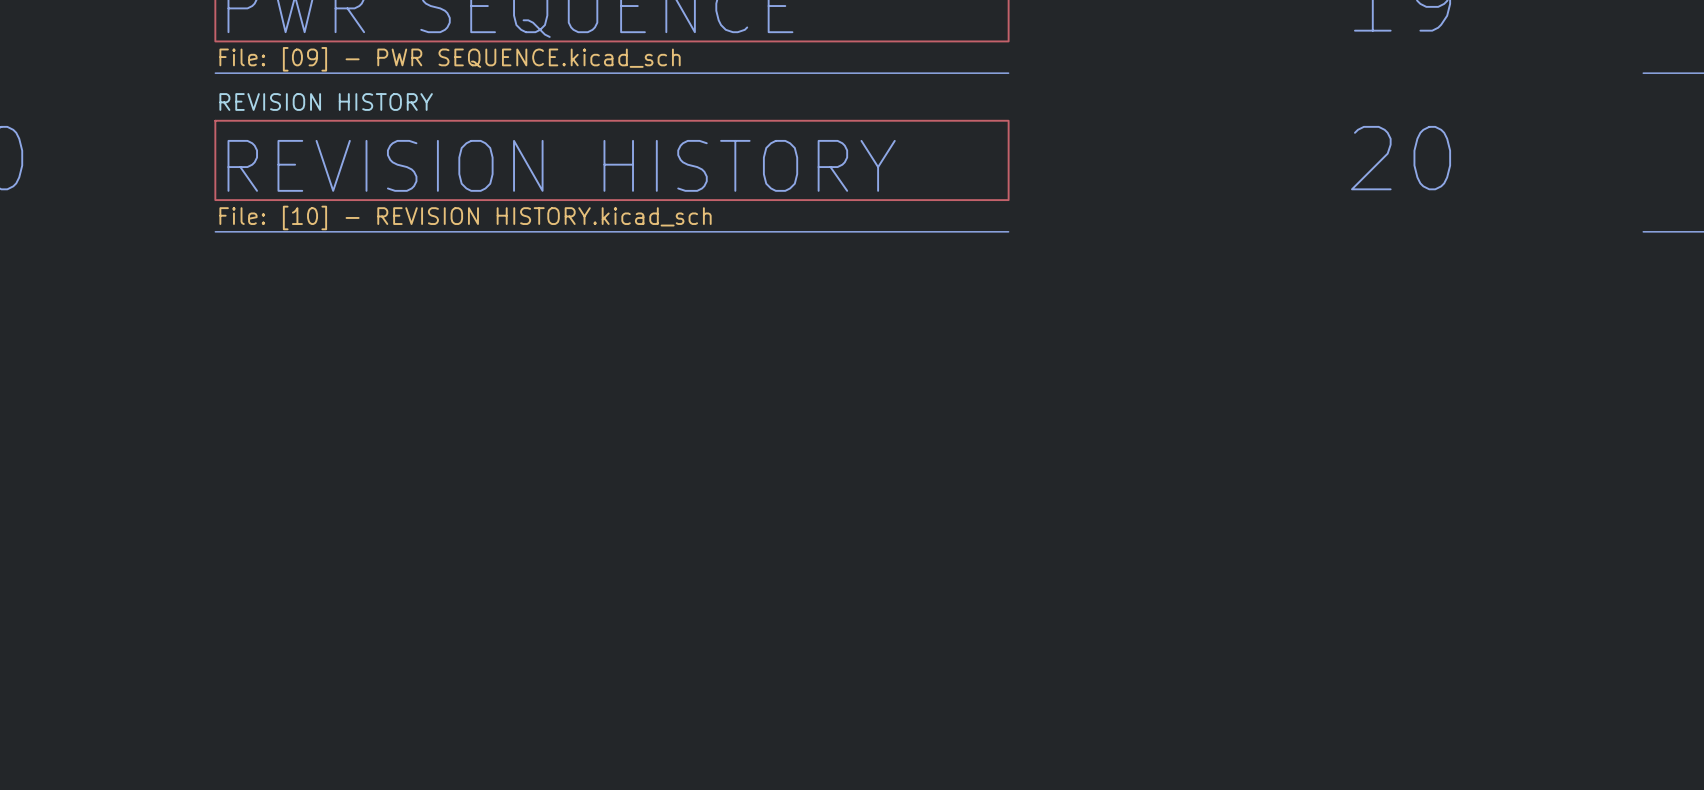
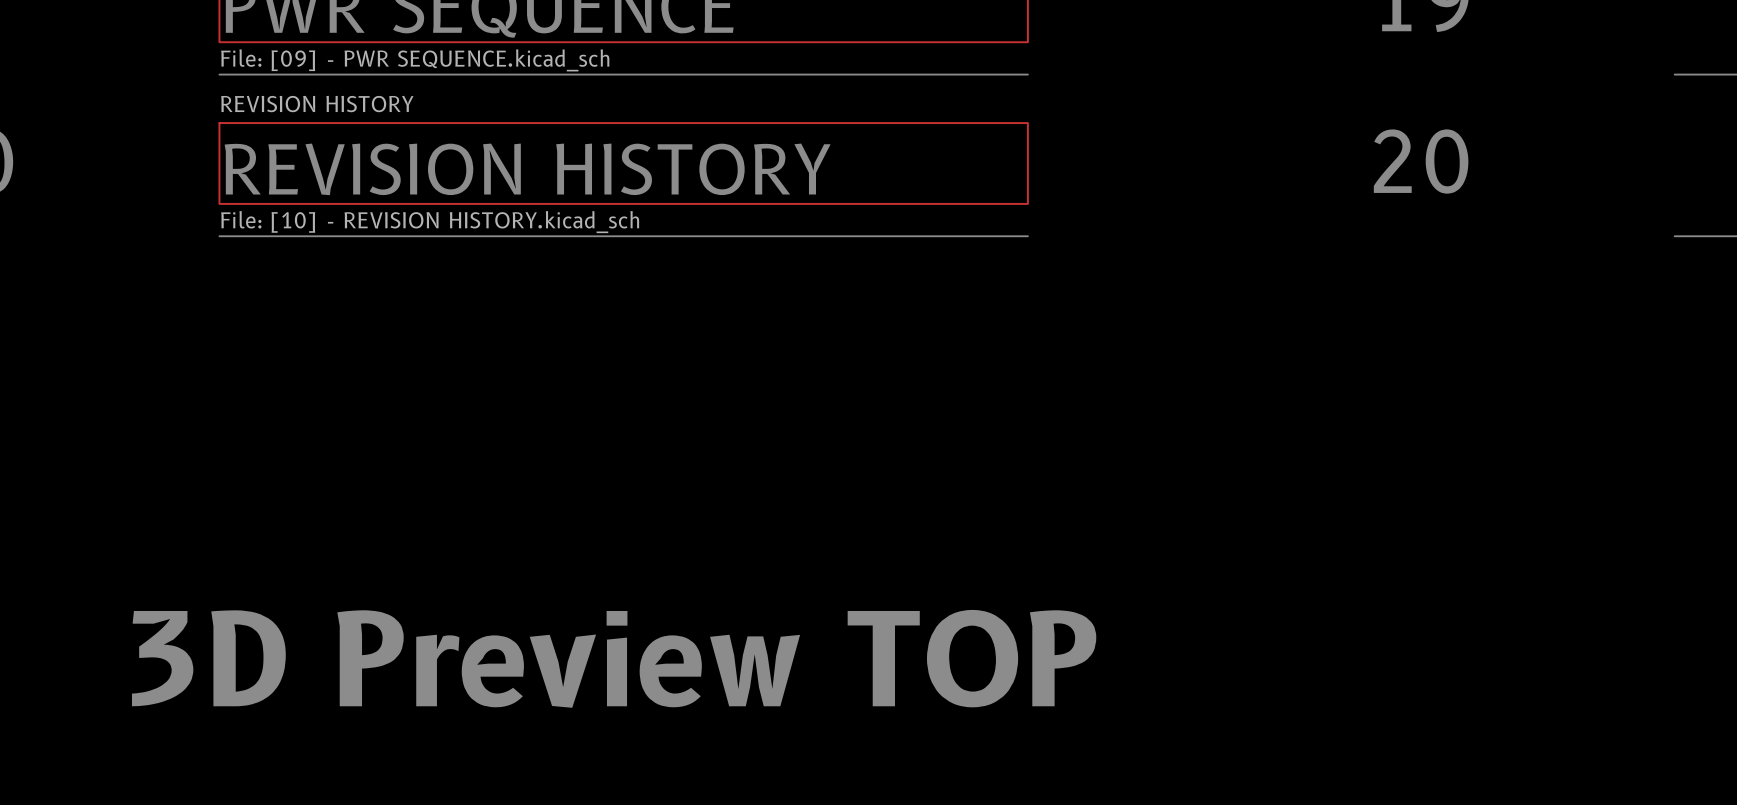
text: none -> 3D Preview TOP (614, 658)

